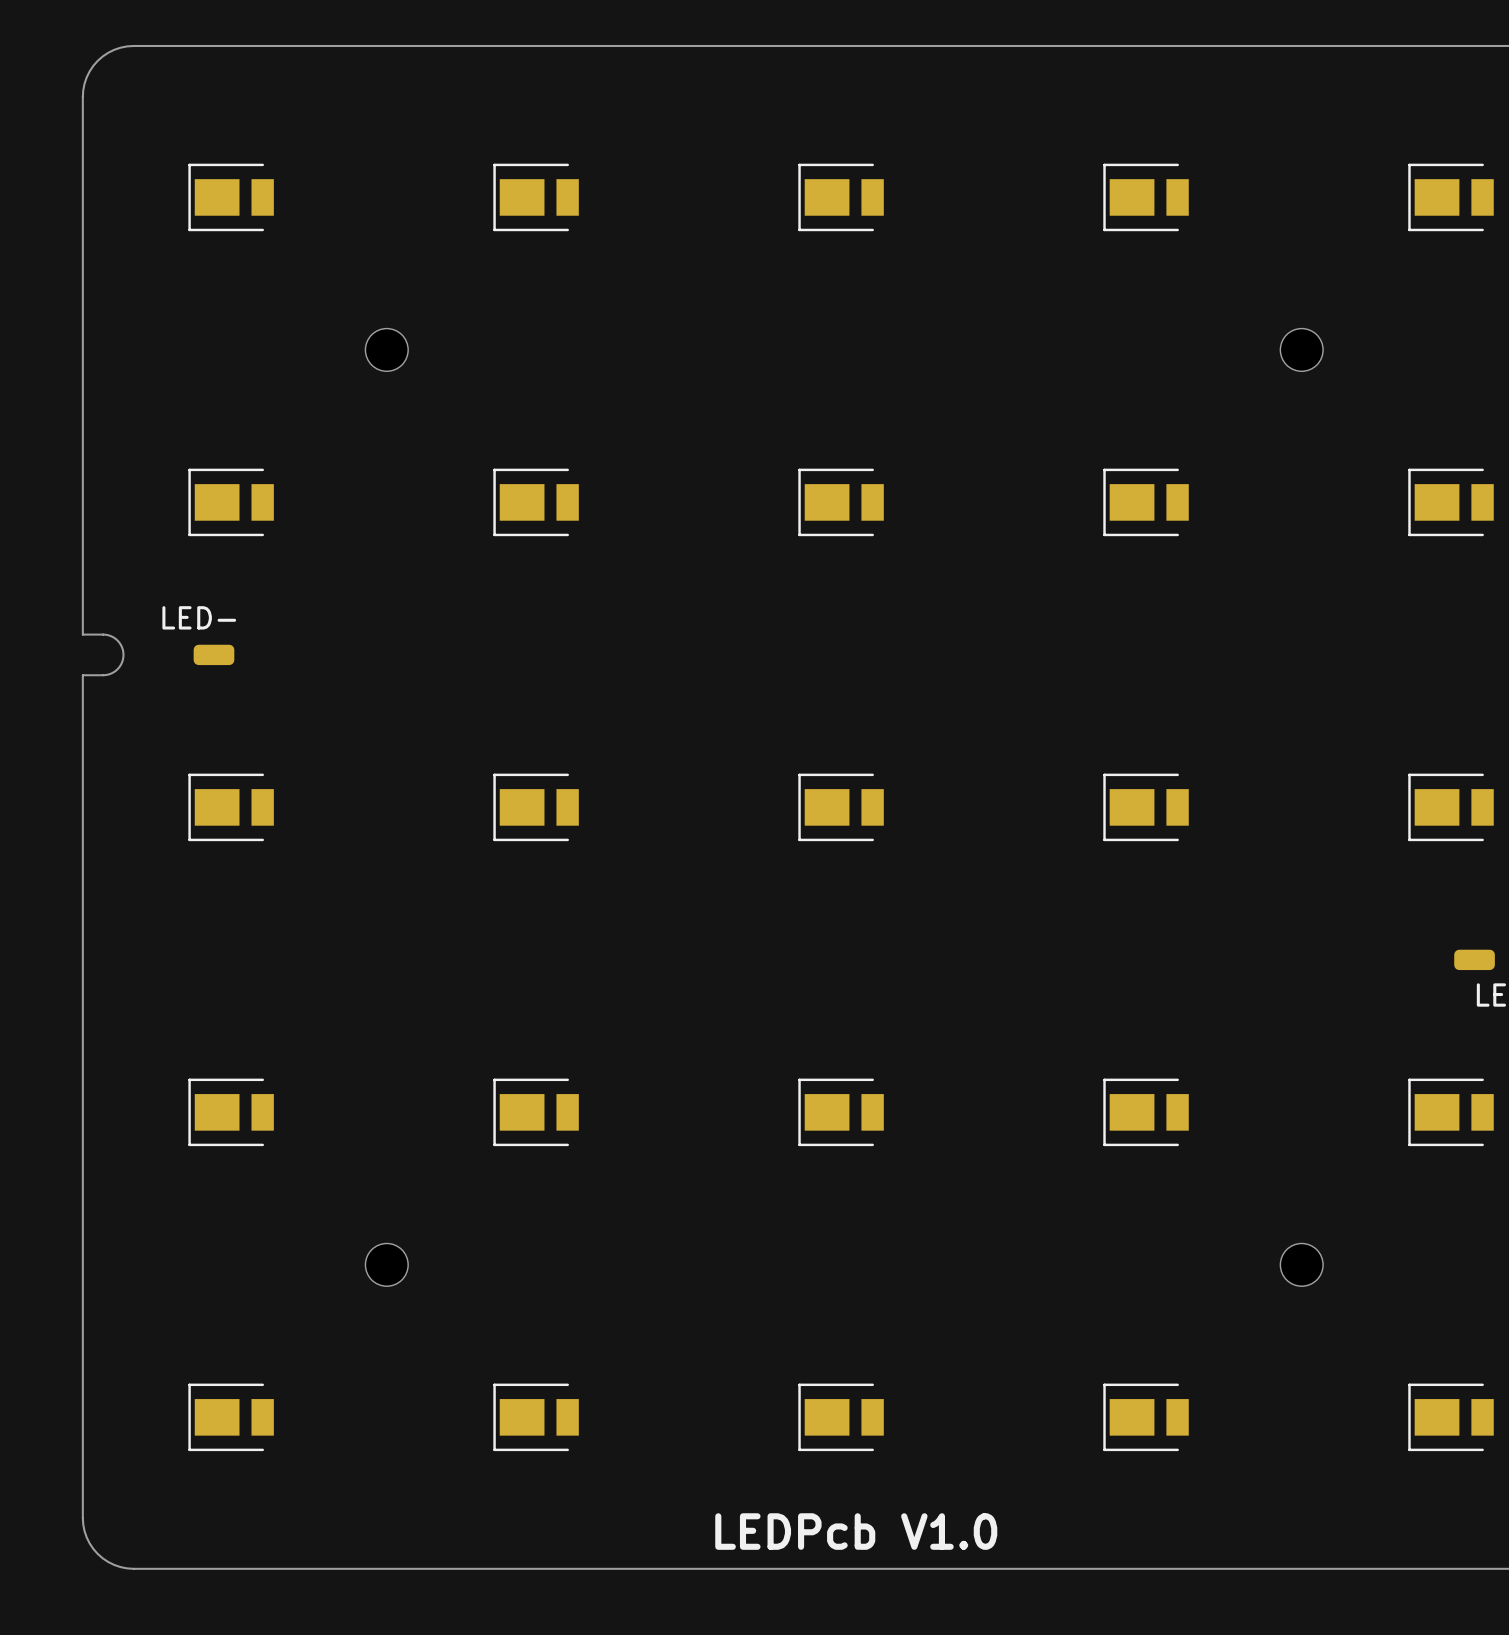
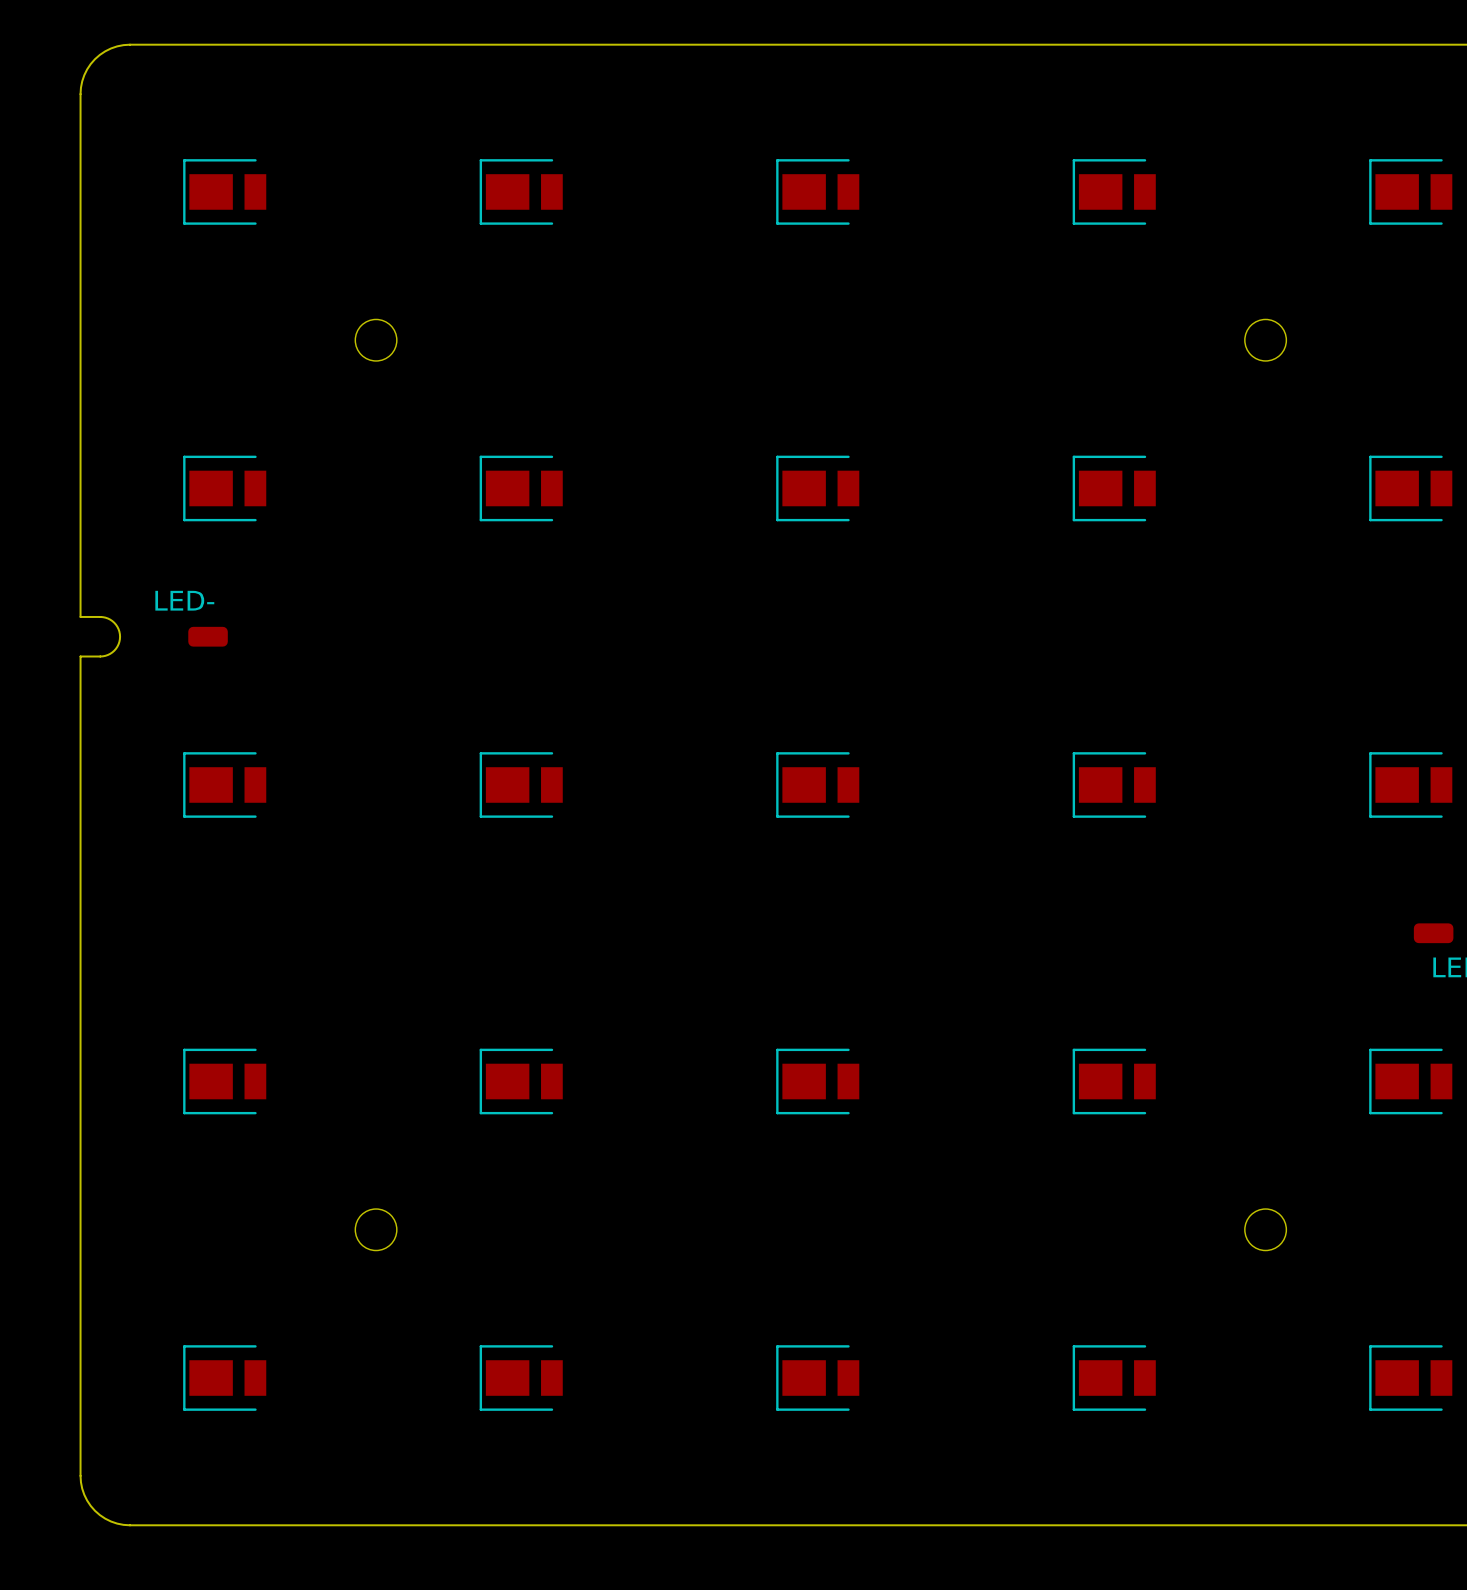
text: LEDPcb V1.0 (856, 1531) -> none

